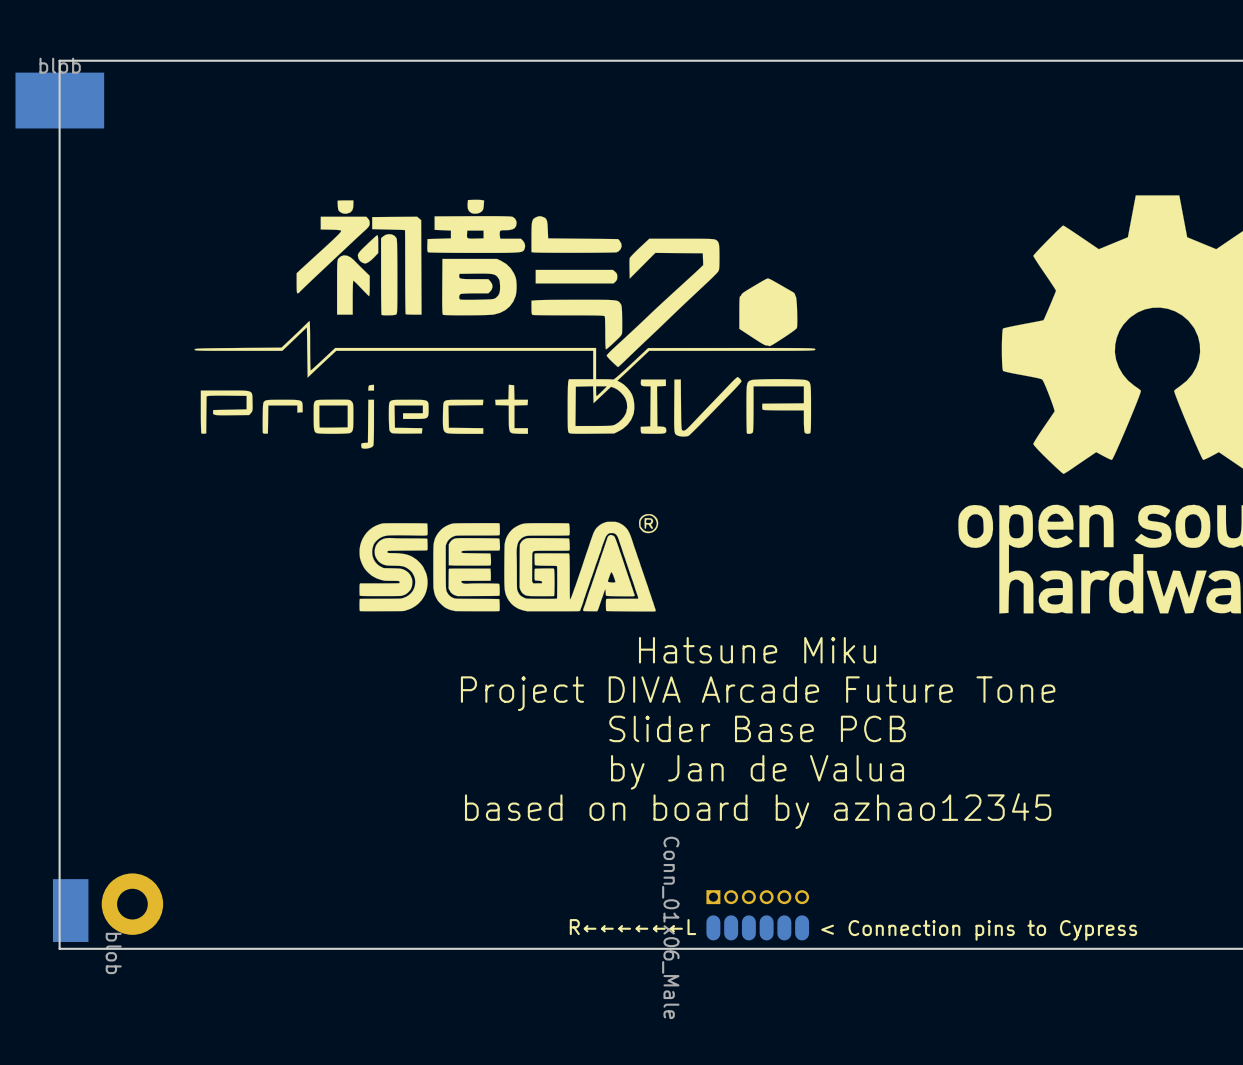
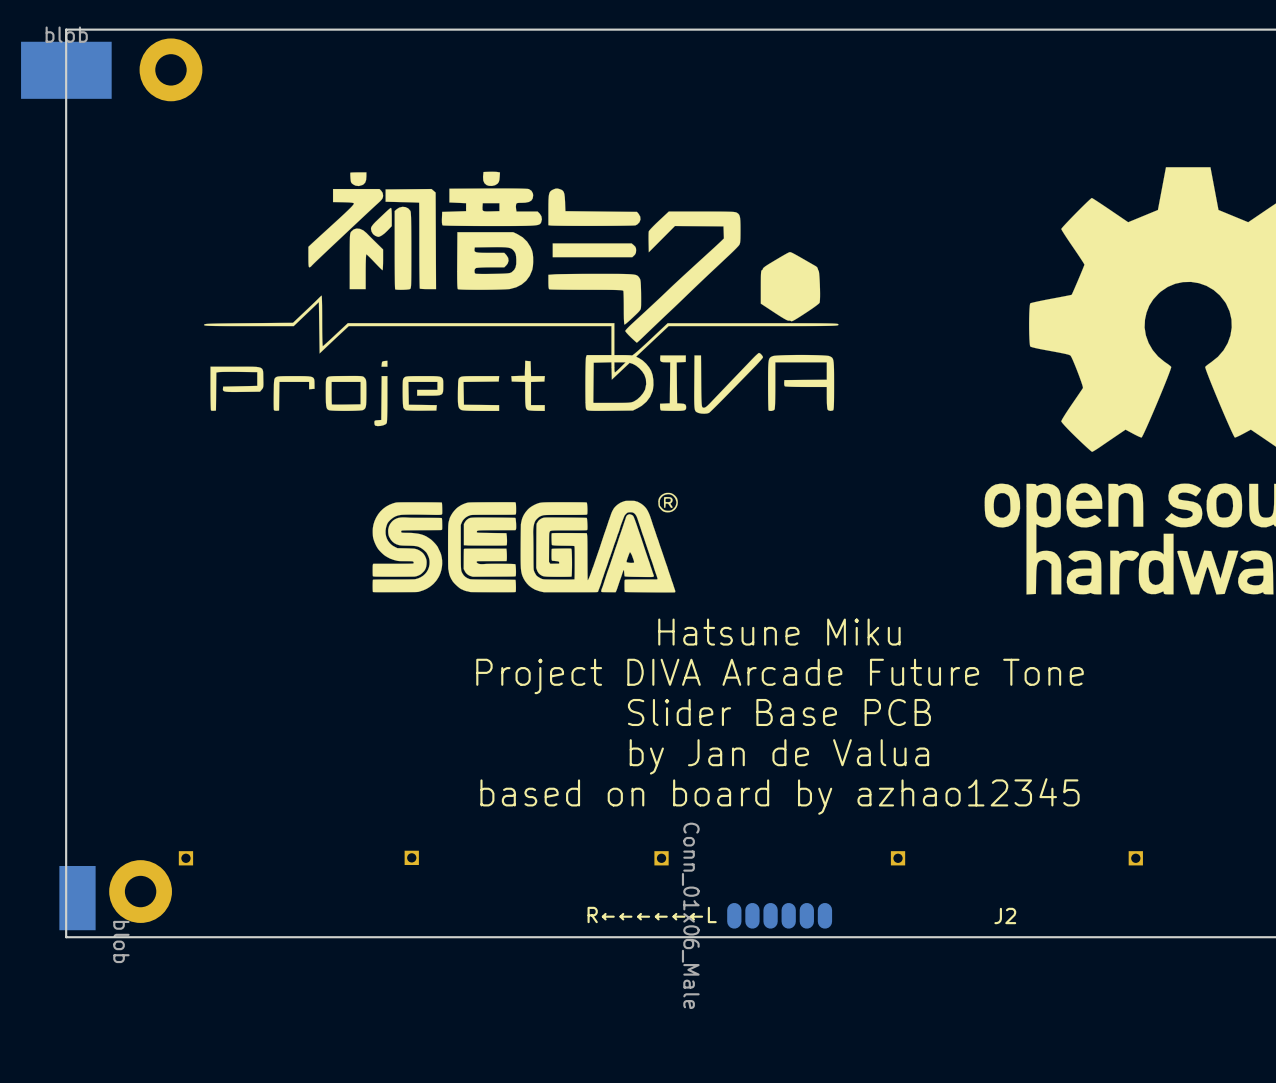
part: none -> (170, 69)
part: none -> (185, 858)
part: none -> (411, 857)
part: none -> (661, 858)
part: none -> (898, 858)
part: none -> (1135, 858)
part: (757, 897) -> none
< Connection pins to Cypress name: < Connection pins to Cypress (979, 930) -> J2 (1005, 915)

